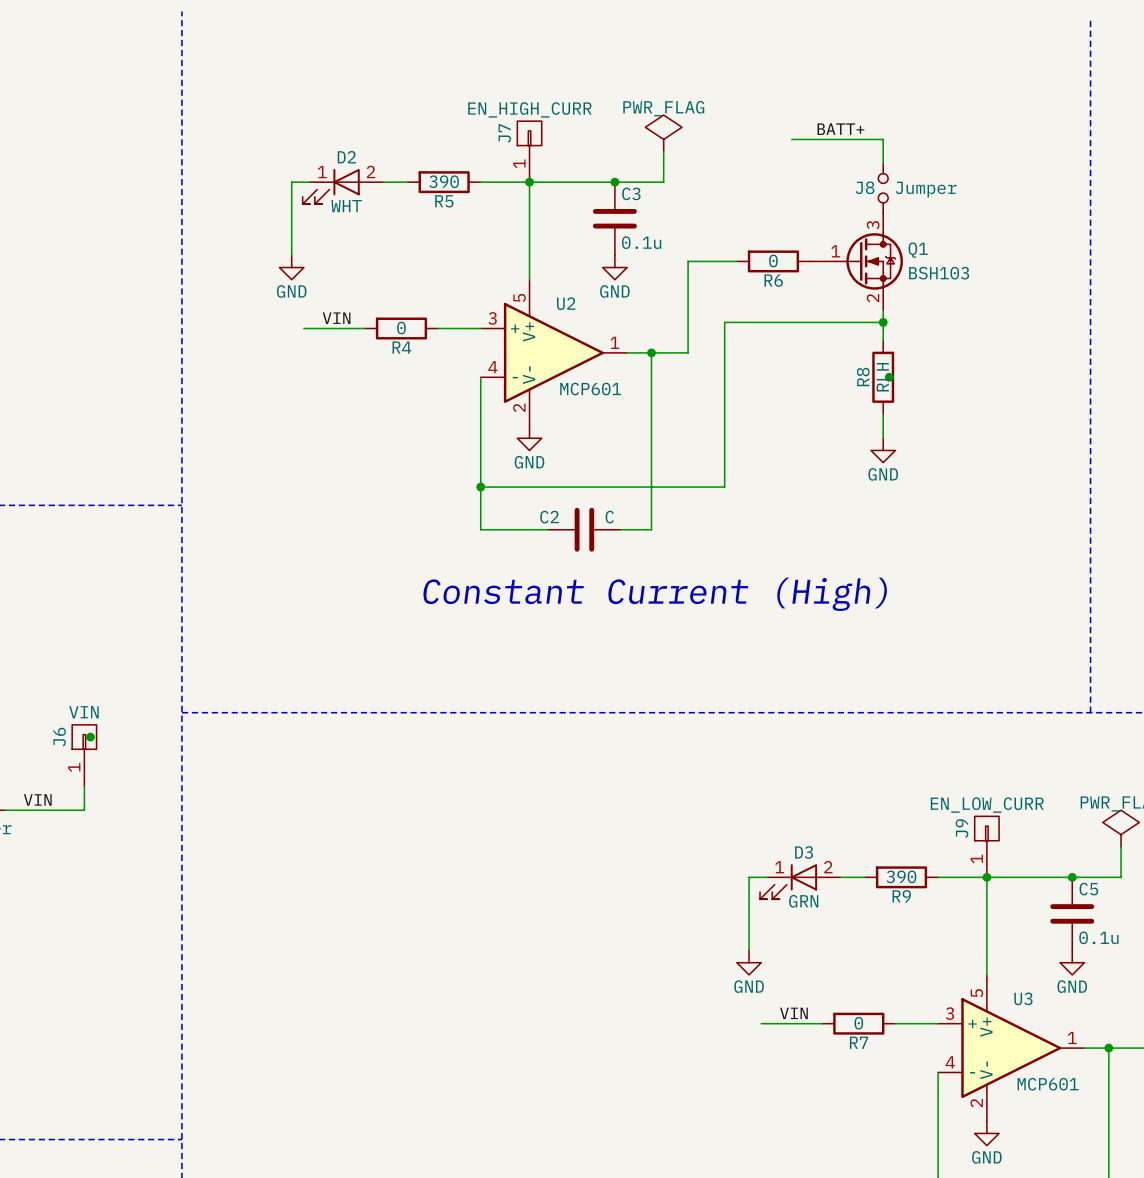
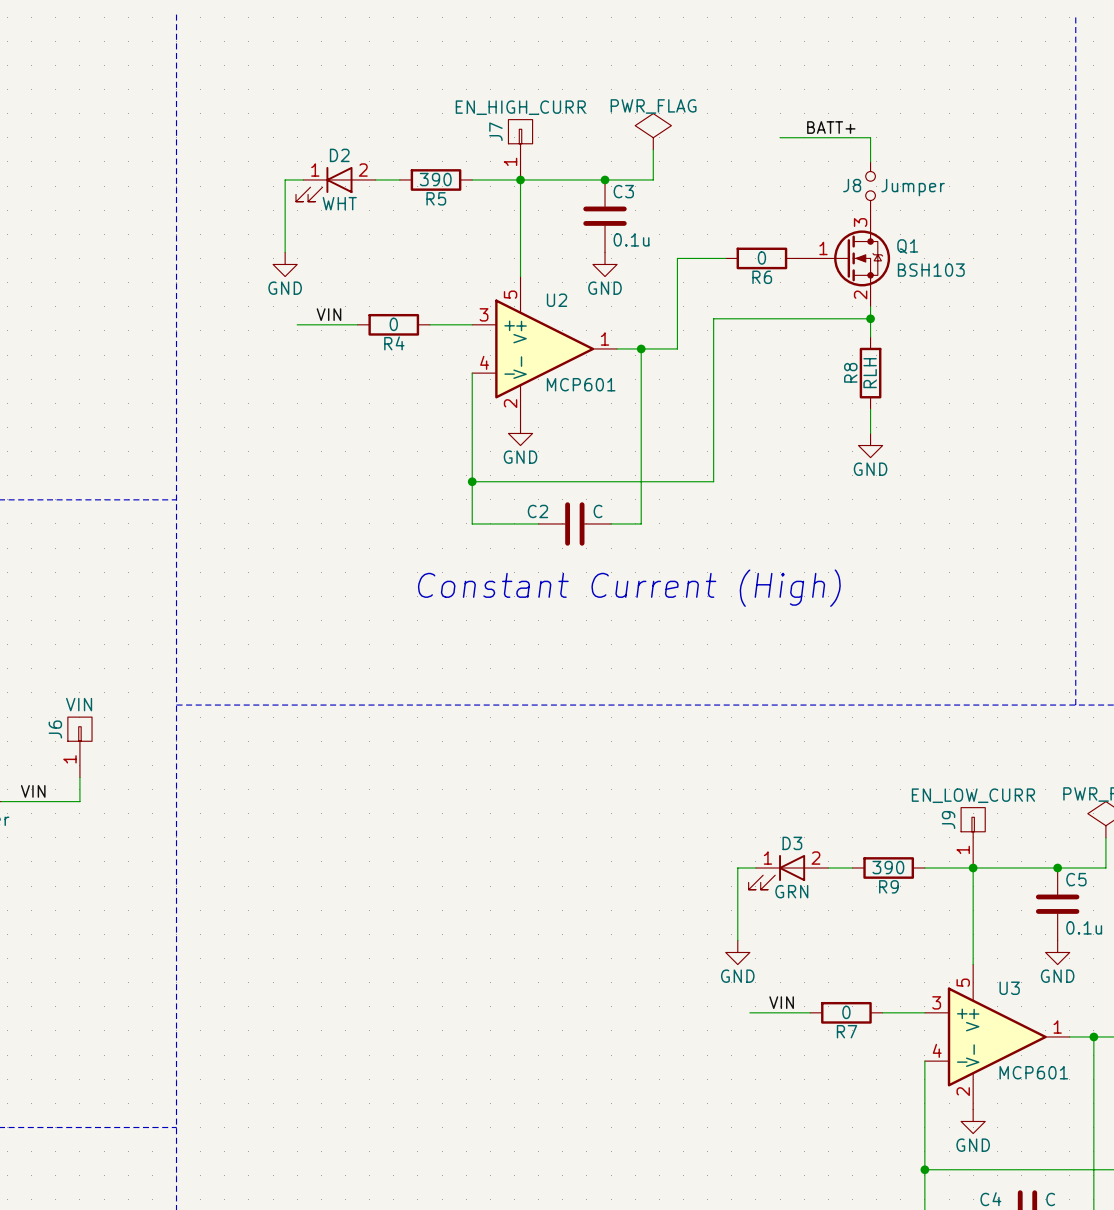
junction: (889, 377) -> none
junction: (90, 737) -> none

